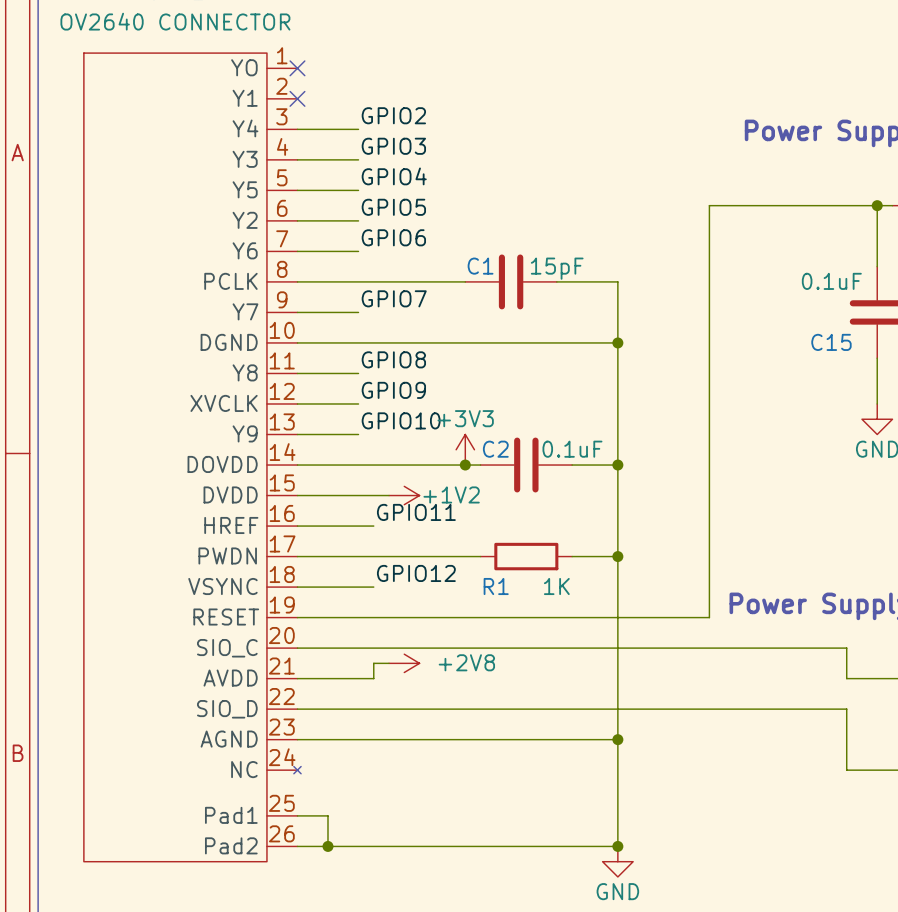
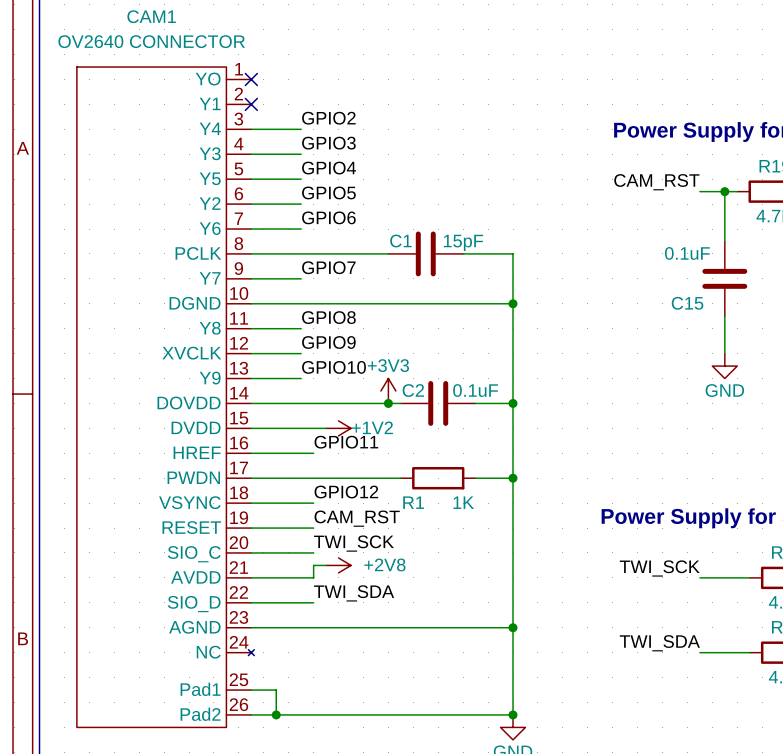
label: none -> CAM_RST (656, 182)
wire: (846, 205) (709, 205) (709, 617) (373, 617) -> none
label: none -> CAM_RST (357, 518)
label: none -> TWI_SCK (353, 543)
wire: (373, 648) (846, 648) (846, 678) -> none
label: none -> TWI_SCK (659, 568)
label: none -> TWI_SDA (354, 593)
wire: (373, 709) (846, 709) (846, 770) -> none
label: none -> TWI_SDA (659, 643)

